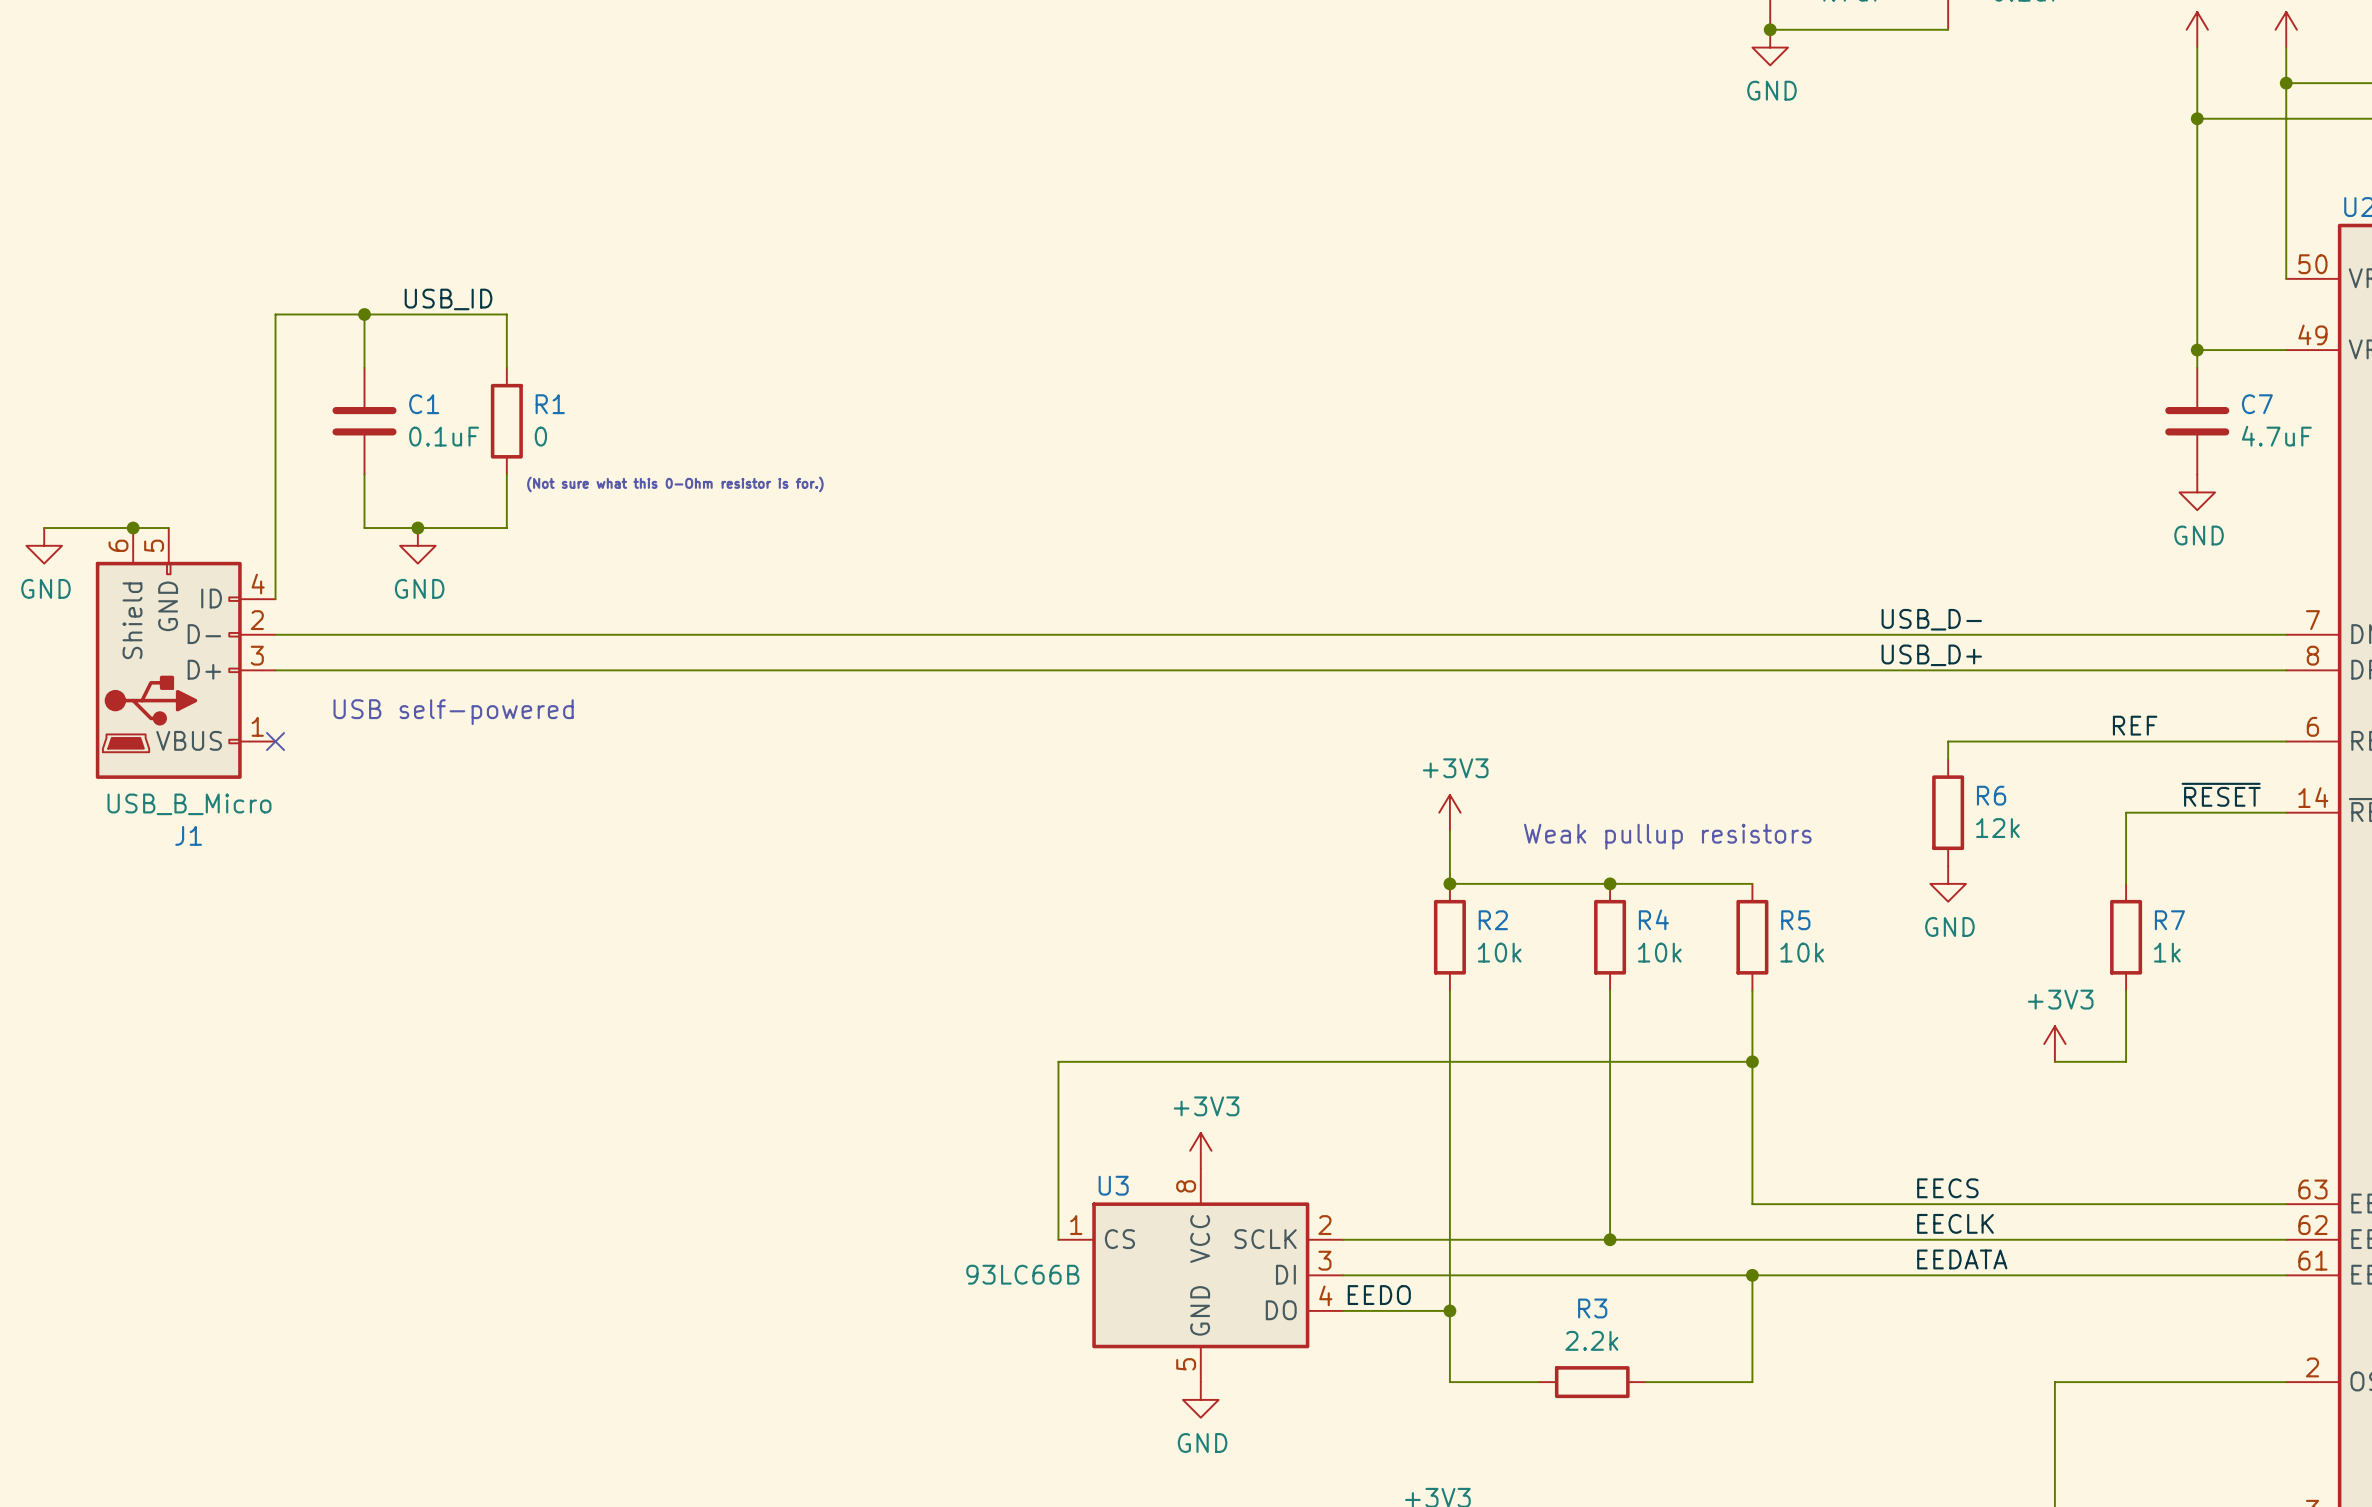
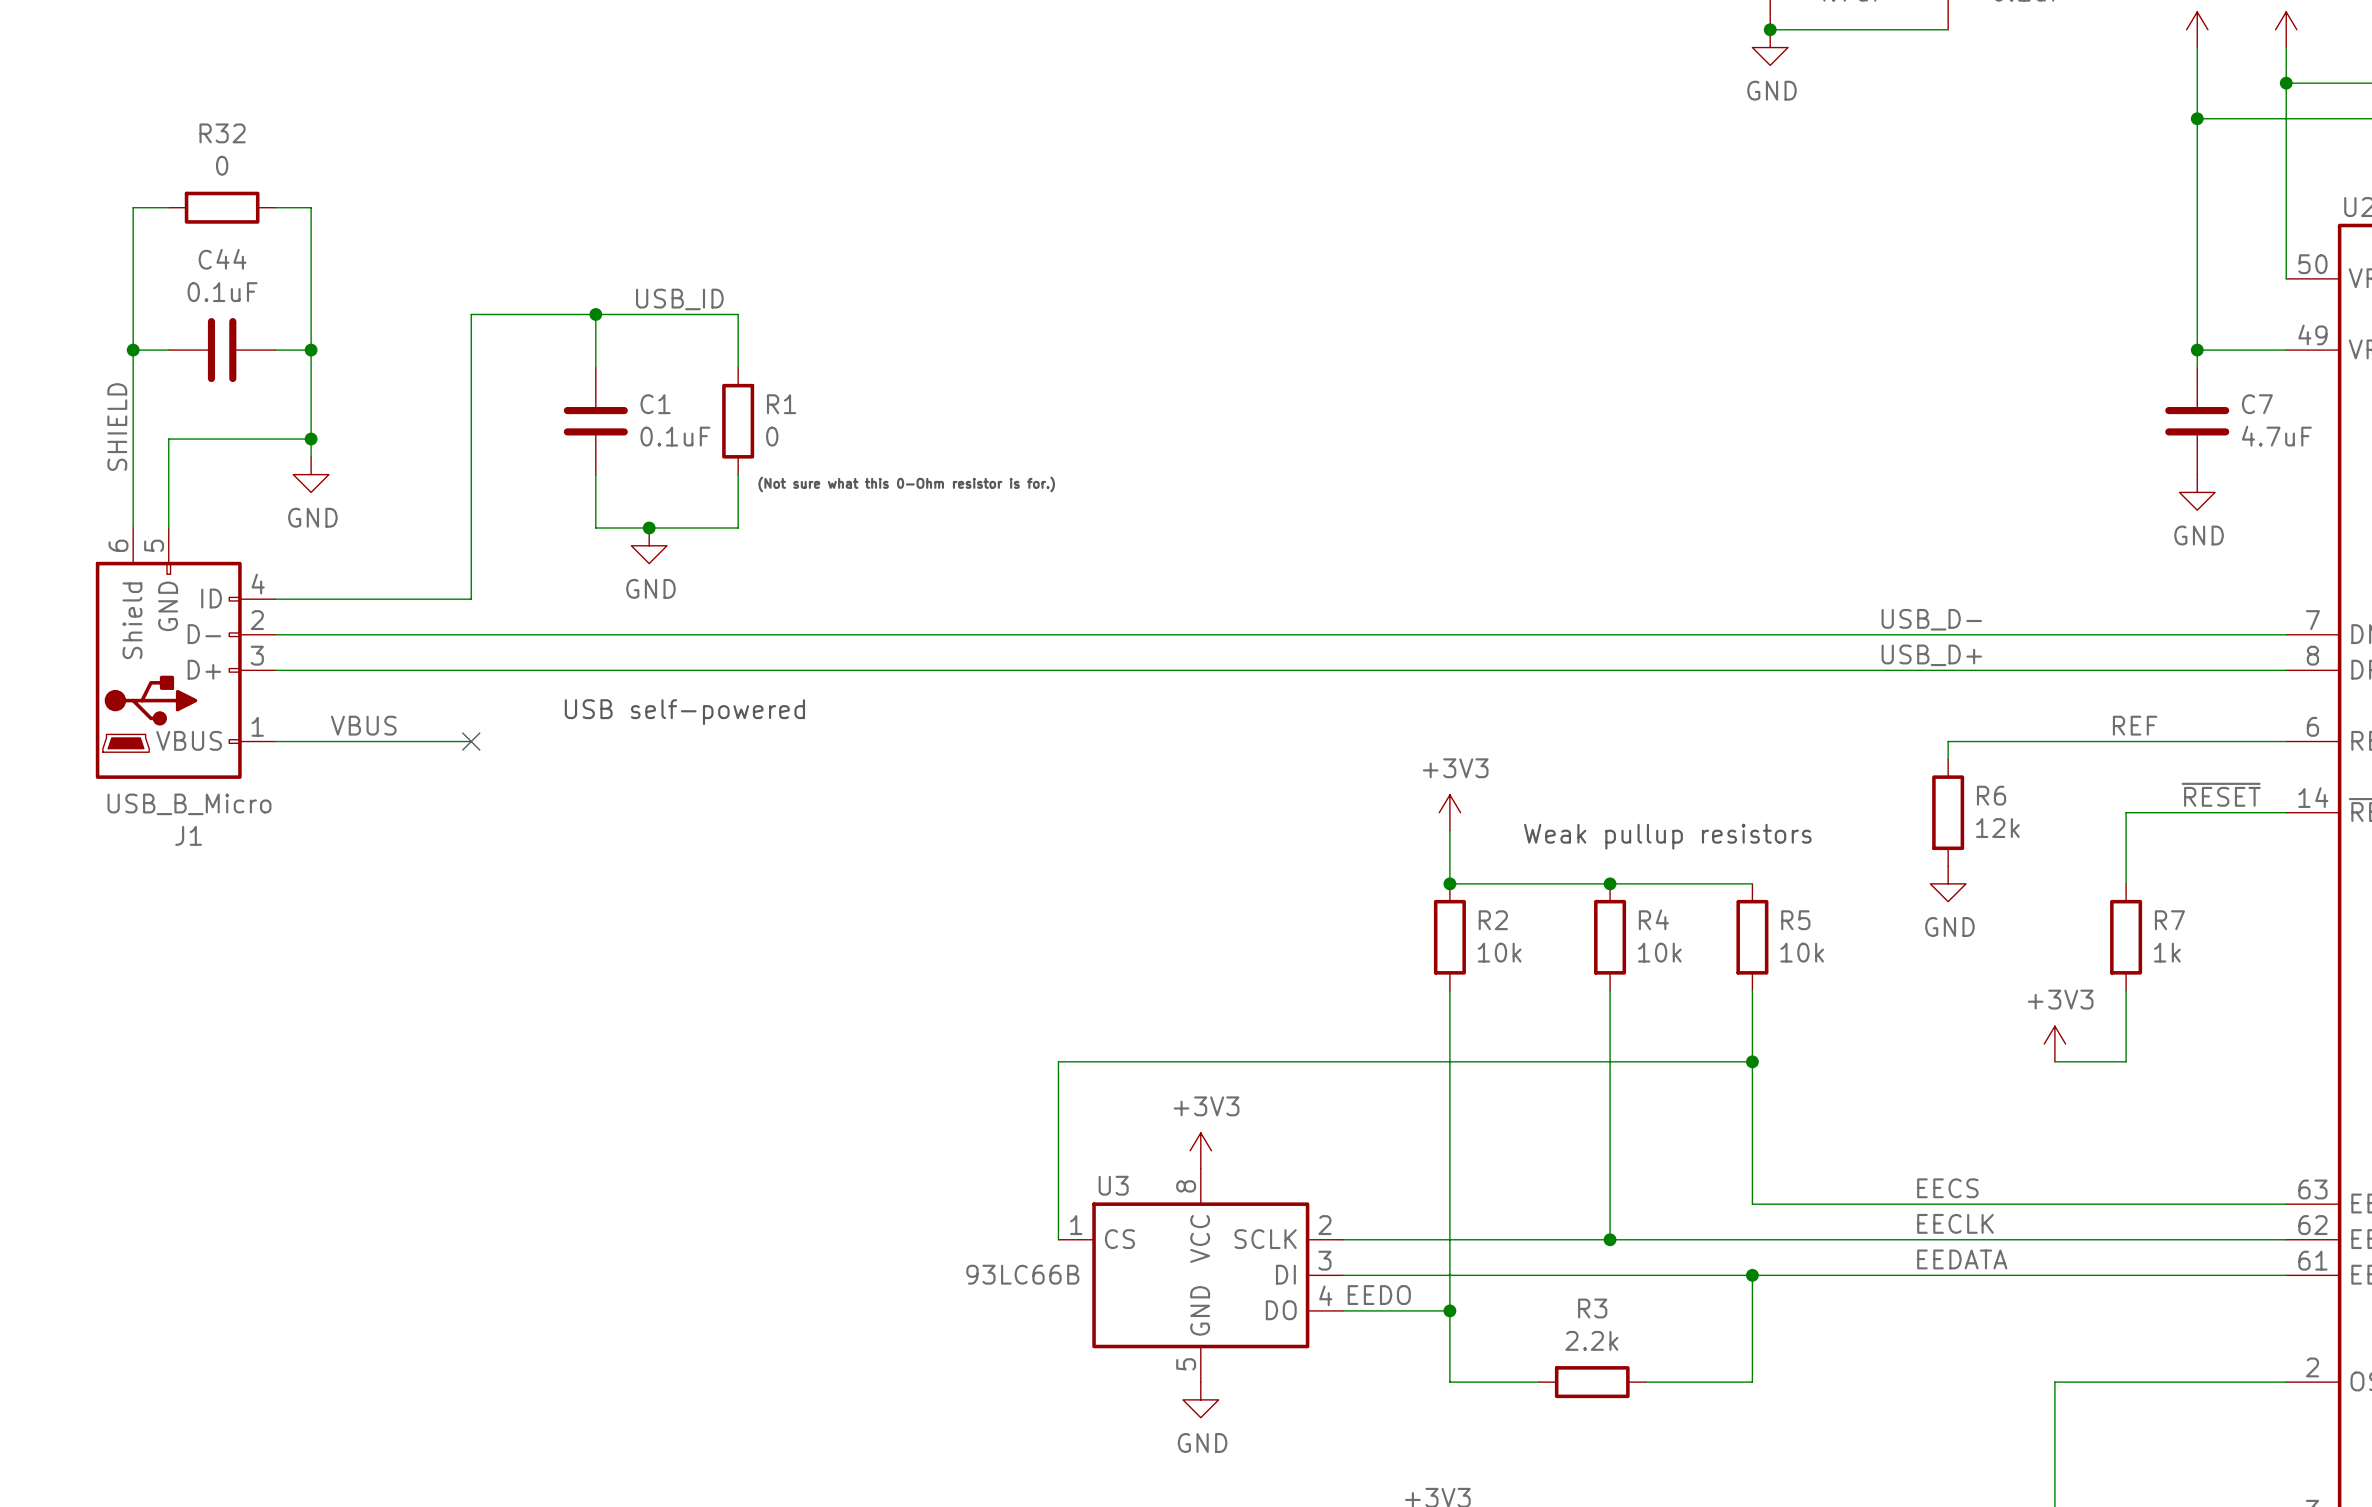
wire: none -> (168, 207) (133, 207) (133, 528)
R32: none -> 0 (222, 207)
wire: none -> (275, 207) (311, 207) (311, 456)
label position: USB_ID (448, 299) -> USB_ID (679, 299)
wire: (364, 314) (364, 367) -> (595, 314) (595, 367)
junction position: (364, 314) -> (311, 350)
wire: (471, 314) (275, 314) (275, 599) -> (471, 314) (471, 599) (275, 599)
wire: (506, 314) (506, 367) -> (506, 314) (738, 314) (738, 367)
junction: none -> (595, 314)
wire: none -> (133, 350) (168, 350)
junction: none -> (133, 350)
C44: none -> 0.1uF (222, 350)
wire: none -> (275, 350) (311, 350)
C1 position: (364, 421) -> (595, 421)
R1 position: (506, 421) -> (738, 421)
label: none -> SHIELD (117, 427)
junction: none -> (311, 439)
power symbol: none -> GND (311, 474)
wire: (364, 474) (364, 528) (506, 528) (506, 474) -> (595, 474) (595, 528) (738, 528) (738, 474)
text position: (Not sure what this 0-Ohm resistor is for.) (675, 484) -> (Not sure what this 0-Ohm resistor is for.) (906, 484)
wire: (44, 528) (168, 528) -> (311, 439) (168, 439) (168, 528)
junction: (133, 528) -> none
junction: (417, 528) -> none
junction: none -> (649, 528)
power symbol: GND (44, 545) -> none
power symbol: GND (417, 545) -> none
power symbol: none -> GND (649, 545)
text position: USB self-powered (453, 712) -> USB self-powered (684, 712)
label: none -> VBUS (363, 725)
wire: none -> (275, 741) (471, 741)
no-connect mark: (275, 741) -> none
no-connect mark: none -> (471, 741)

